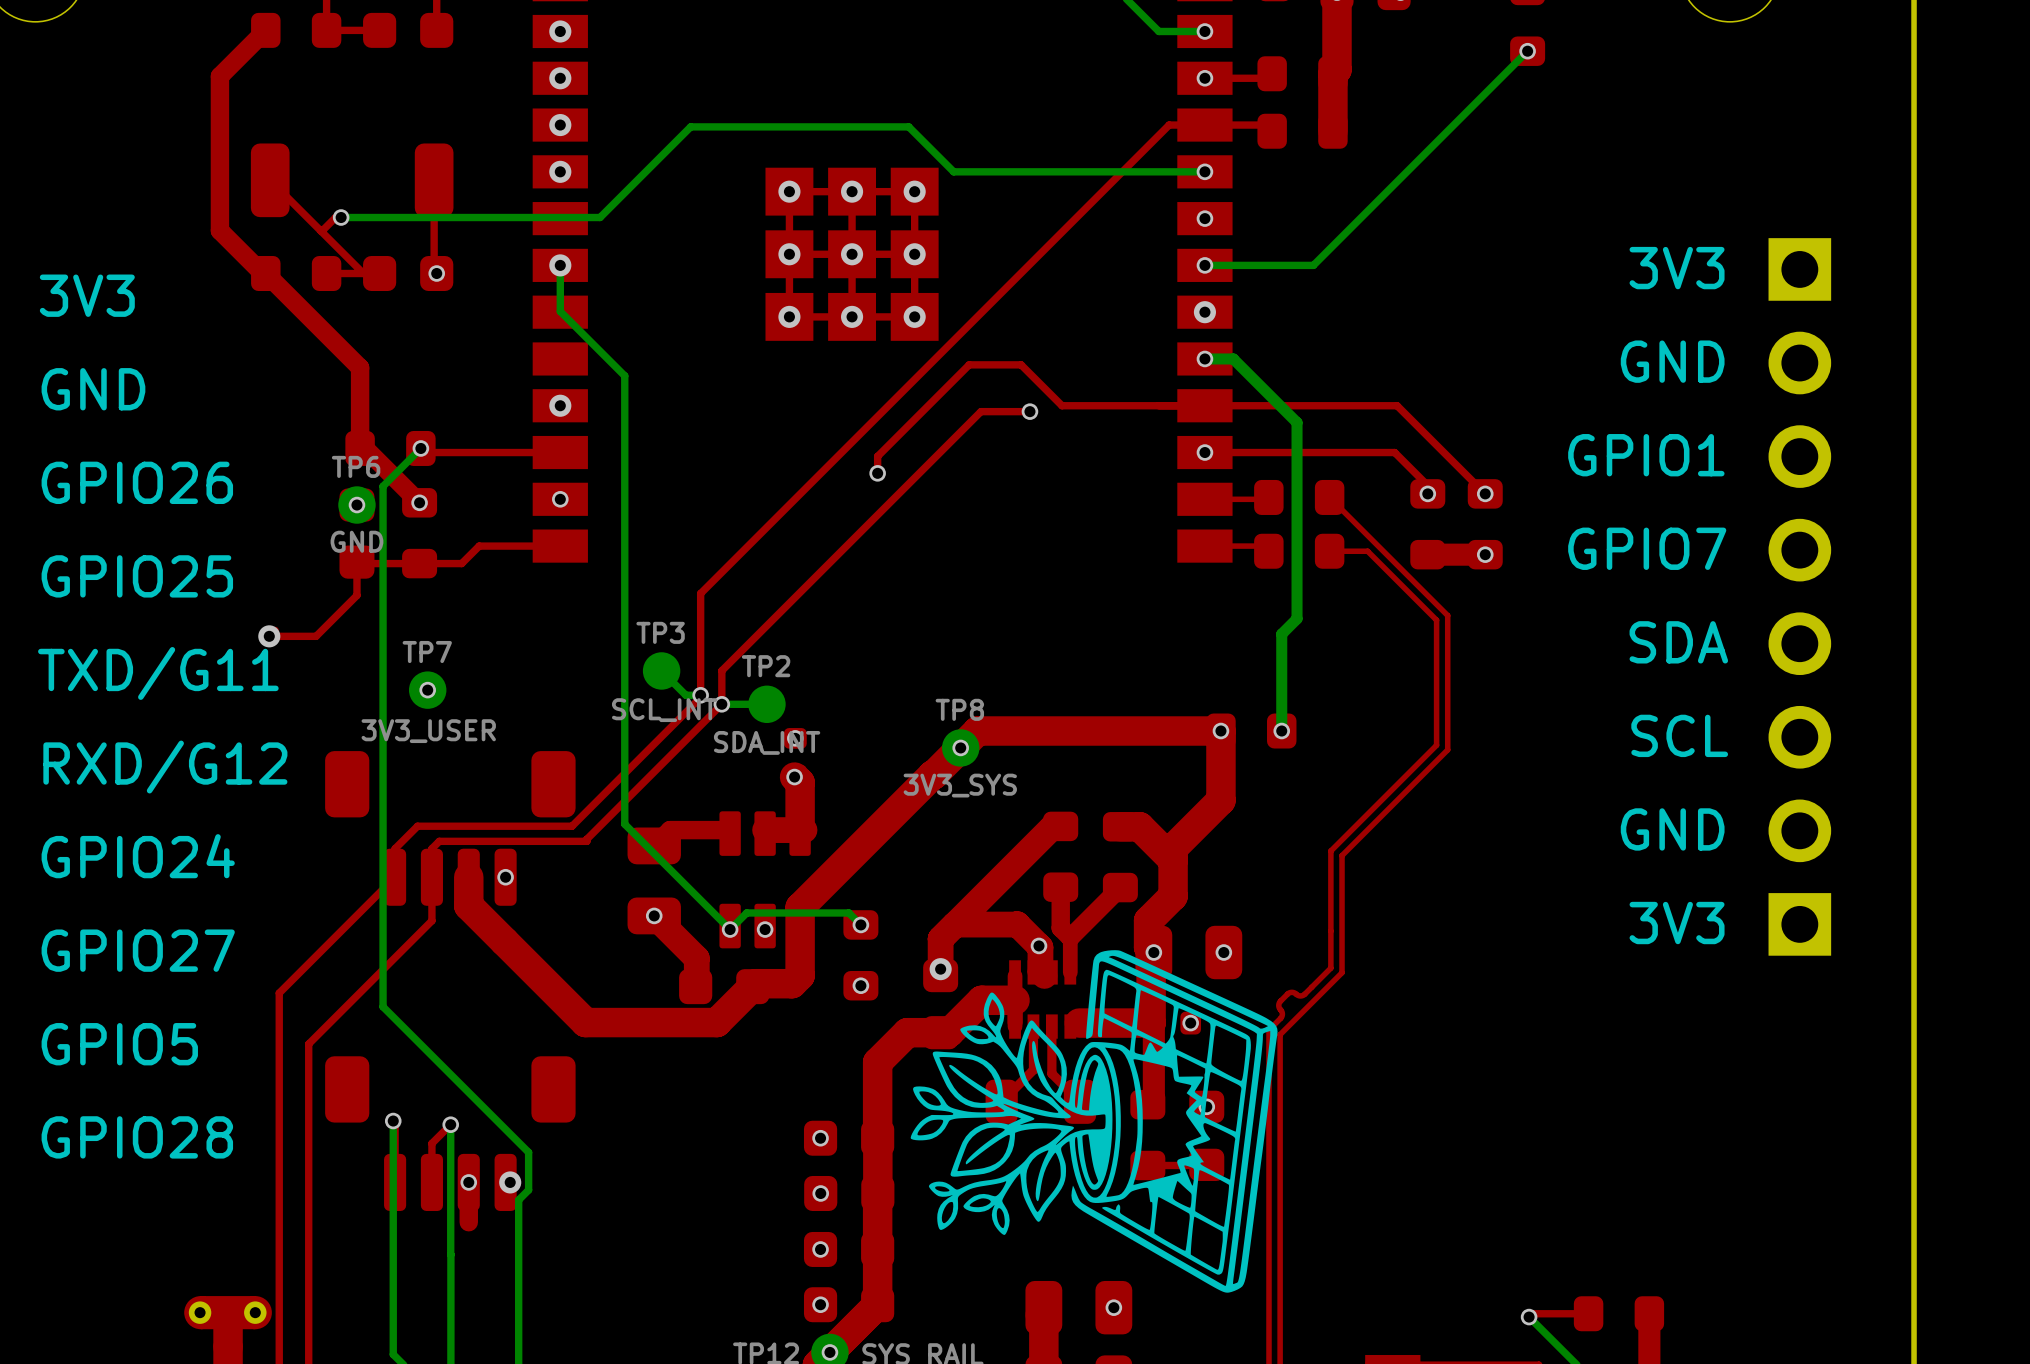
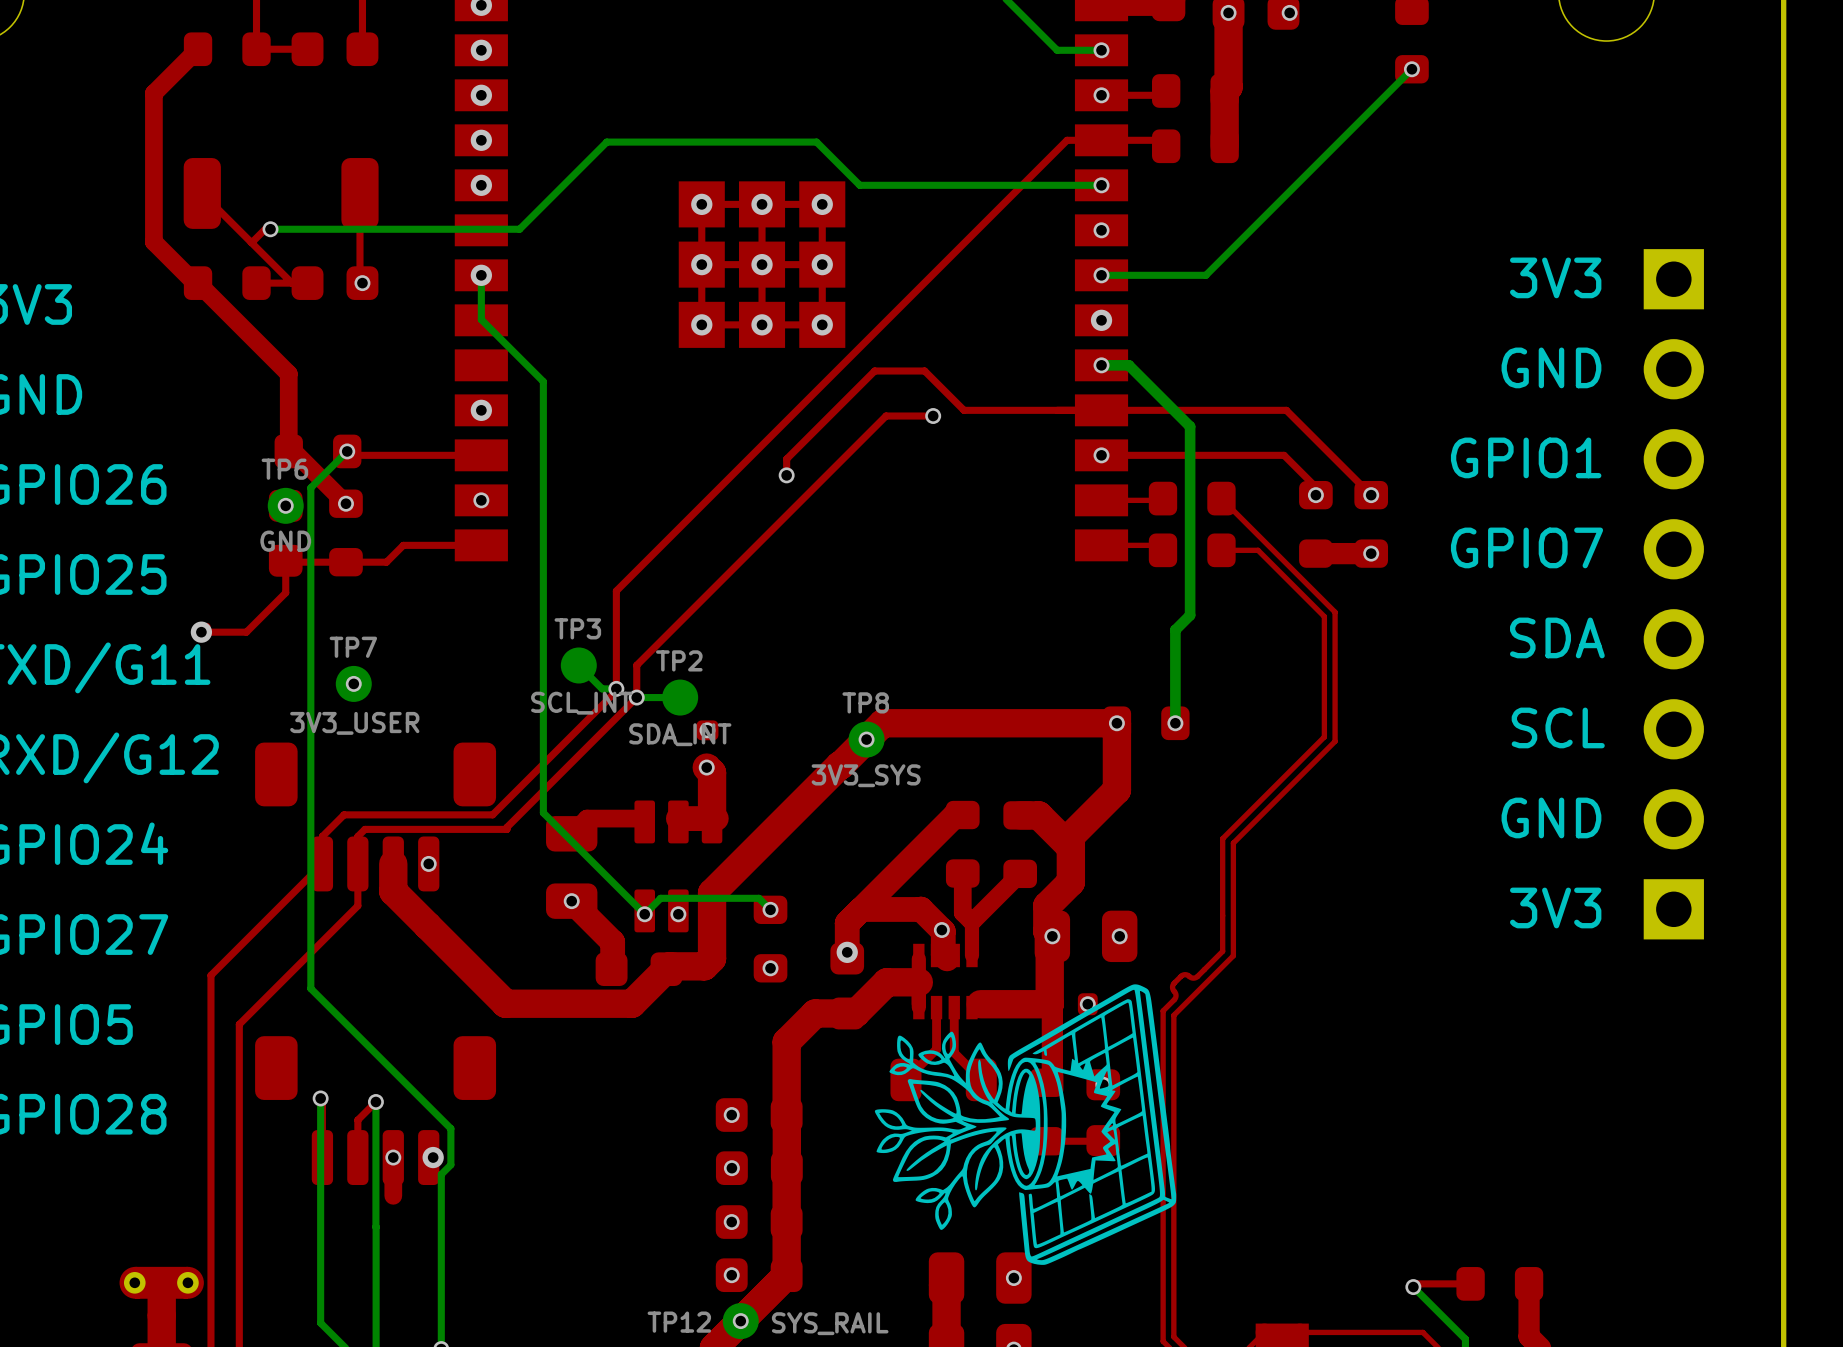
drawing: [910, 950, 1278, 1293] -> none
drawing: none -> [874, 984, 1177, 1265]

